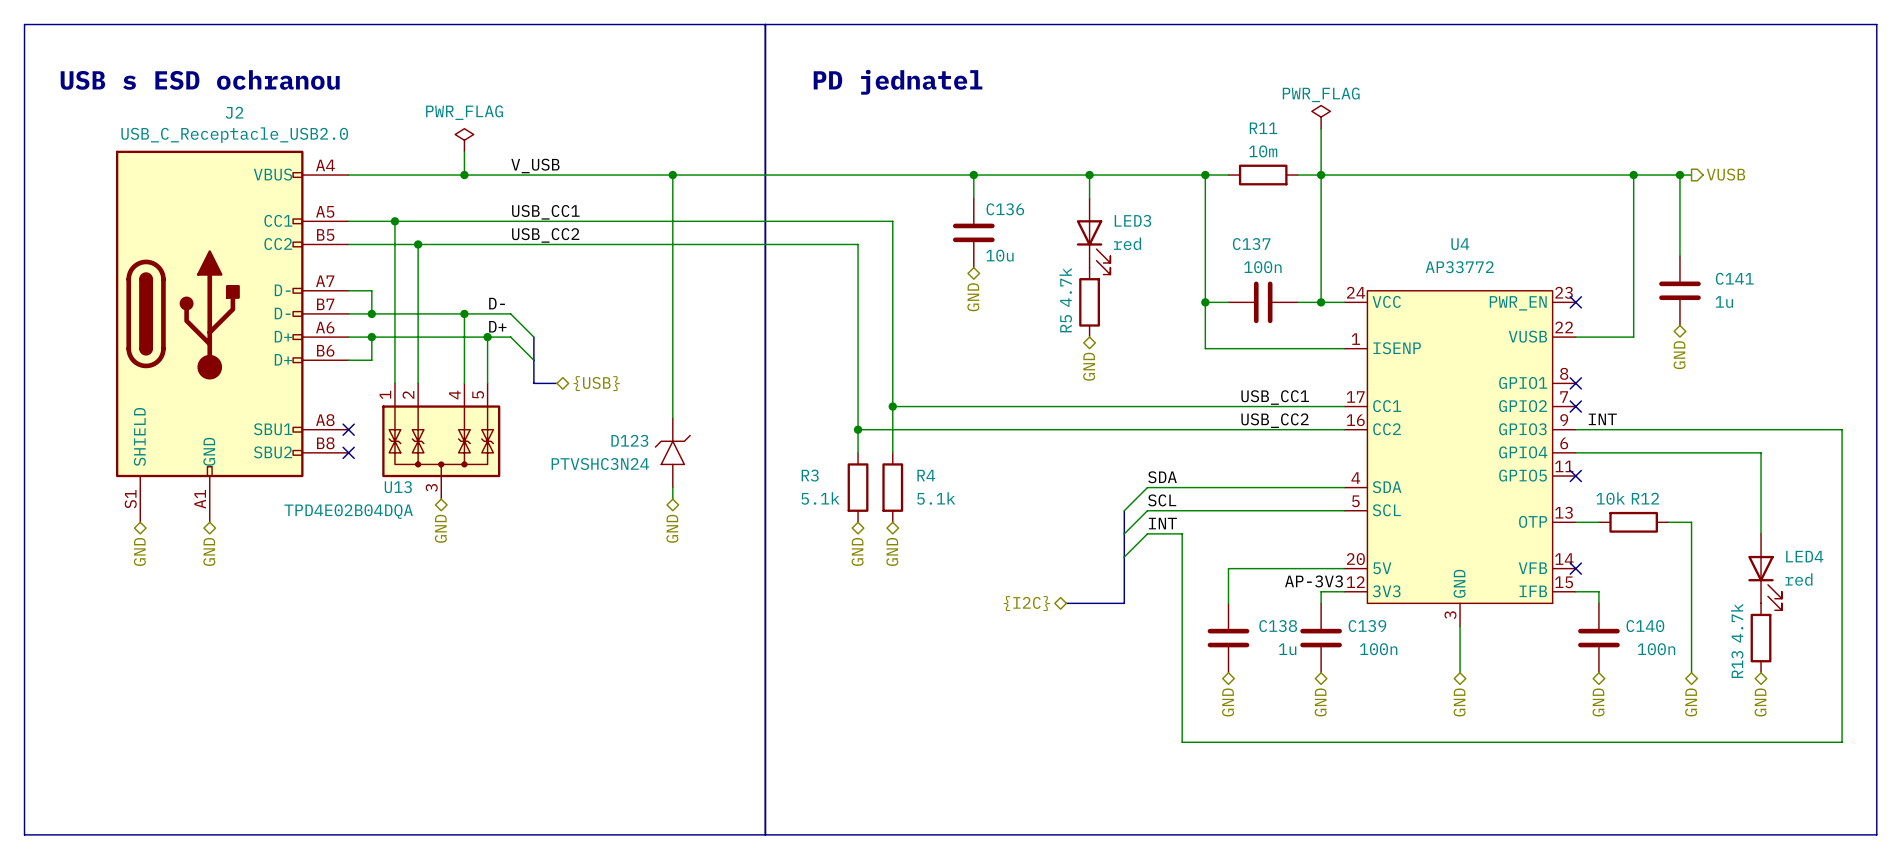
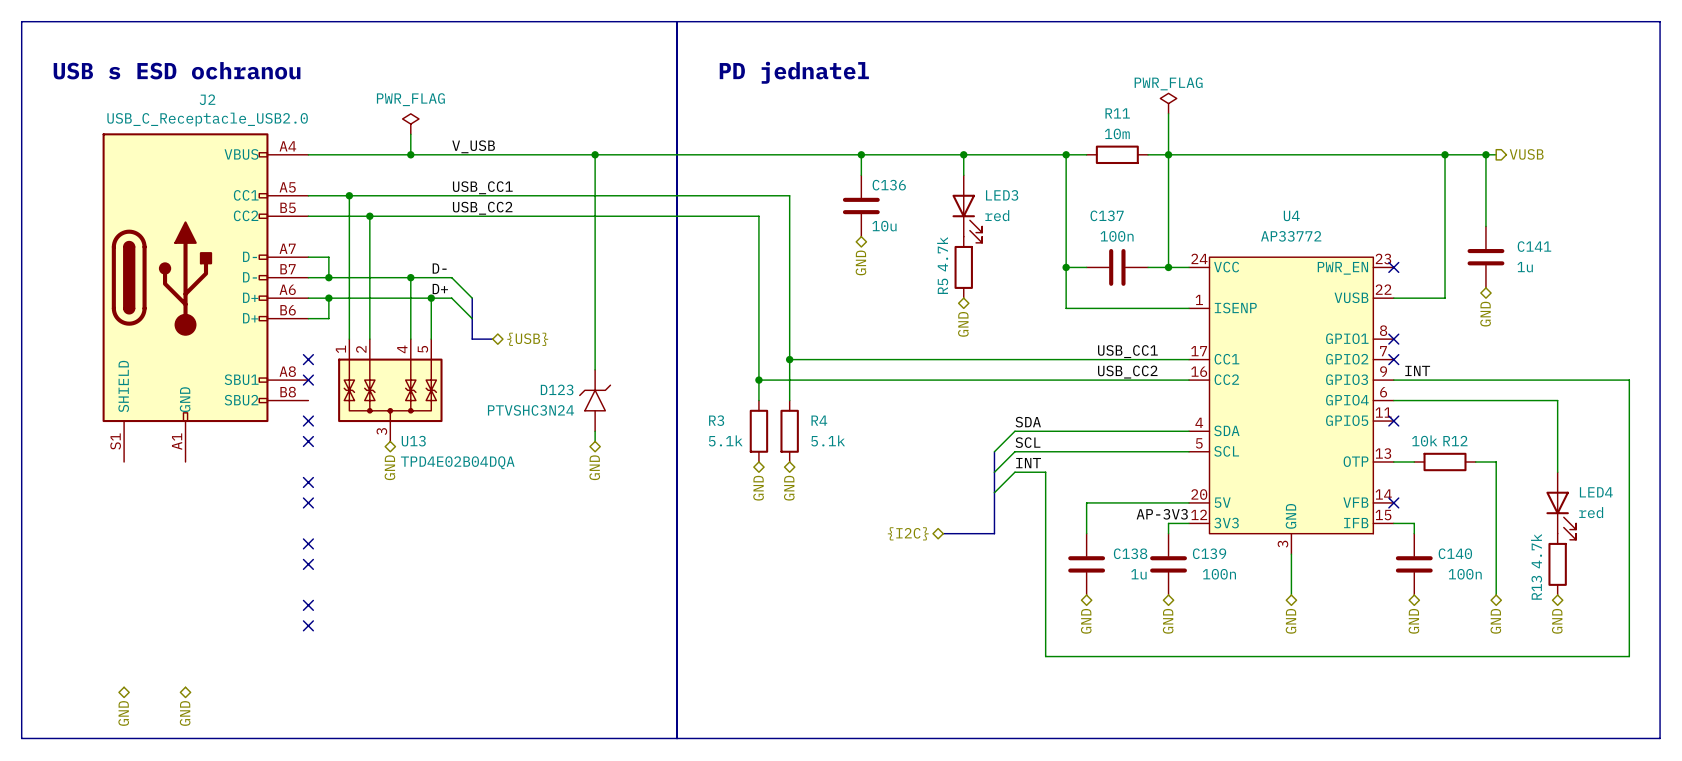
no-connect mark: none -> (308, 359)
no-connect mark: (348, 452) -> none
no-connect mark: none -> (308, 421)
U13 name position: U13 (398, 487) -> U13 (413, 441)
no-connect mark: none -> (308, 441)
U13 value position: TPD4E02B04DQA (348, 511) -> TPD4E02B04DQA (457, 462)
no-connect mark: none -> (308, 482)
hierarchical label: GND (139, 551) -> none
hierarchical label: GND (209, 551) -> none
no-connect mark: none -> (308, 502)
no-connect mark: none -> (308, 543)
no-connect mark: none -> (308, 564)
no-connect mark: none -> (308, 605)
no-connect mark: none -> (308, 625)
hierarchical label: none -> GND (123, 713)
hierarchical label: none -> GND (185, 713)

